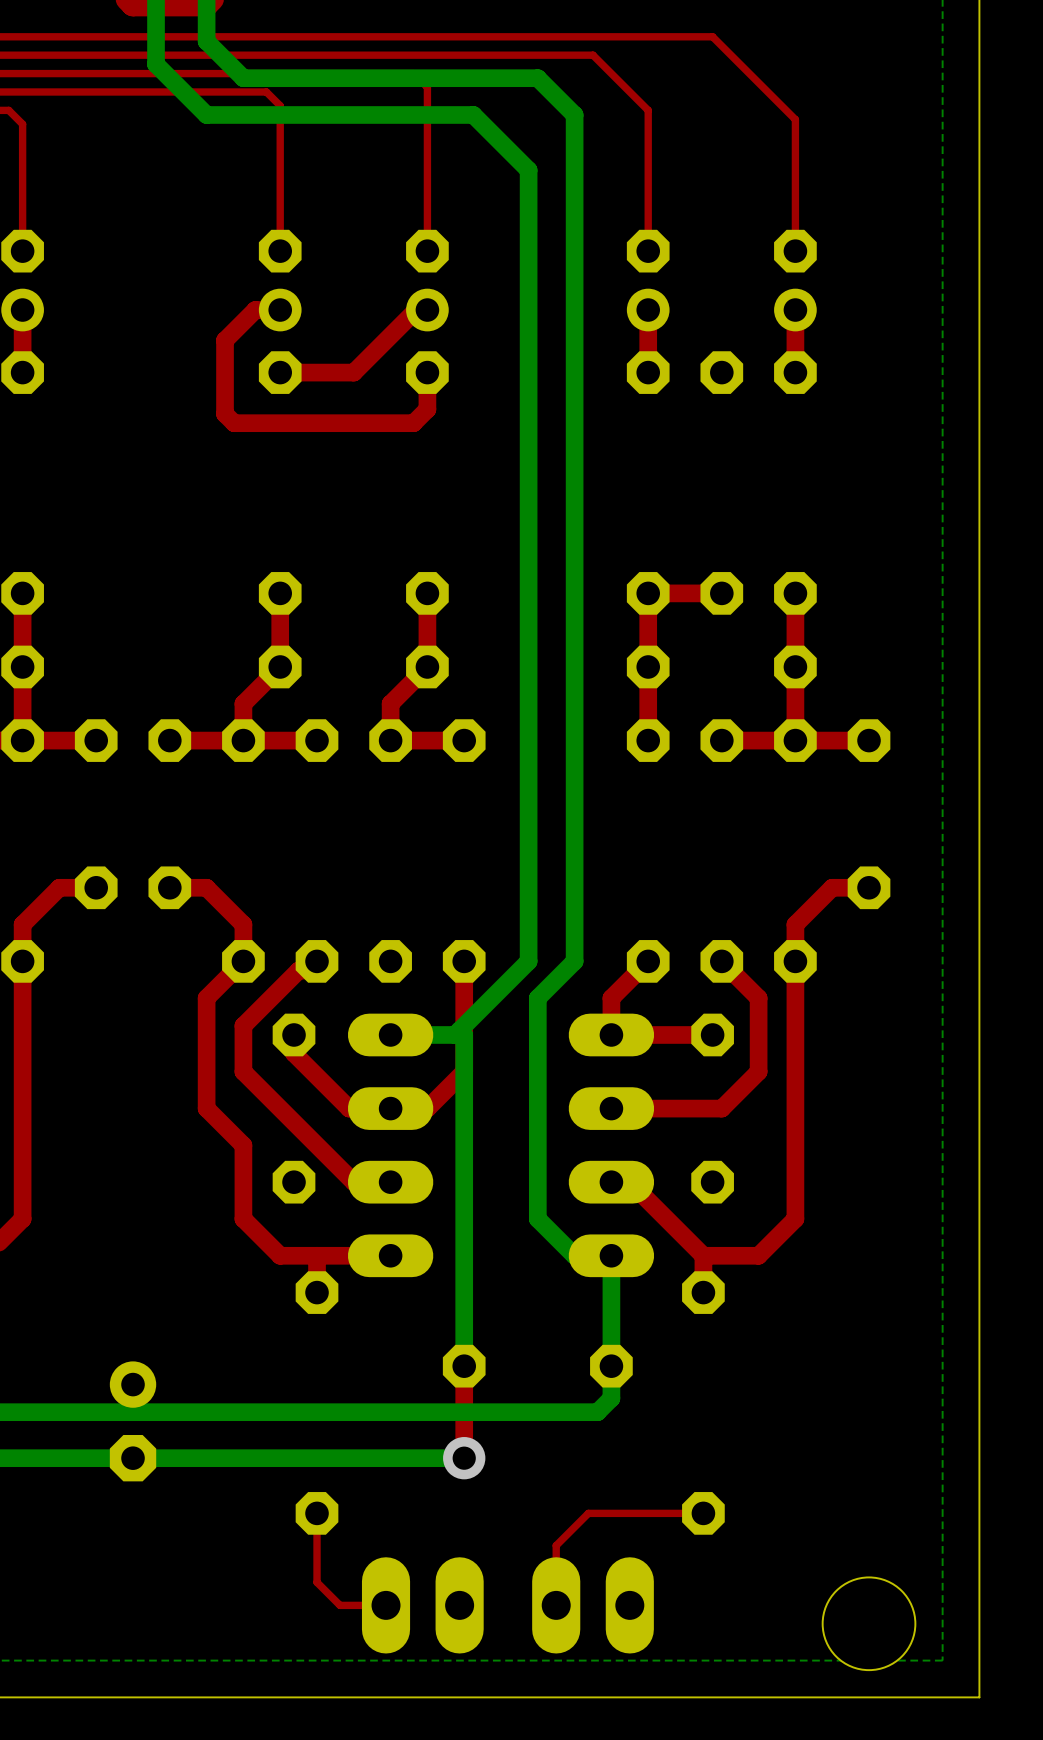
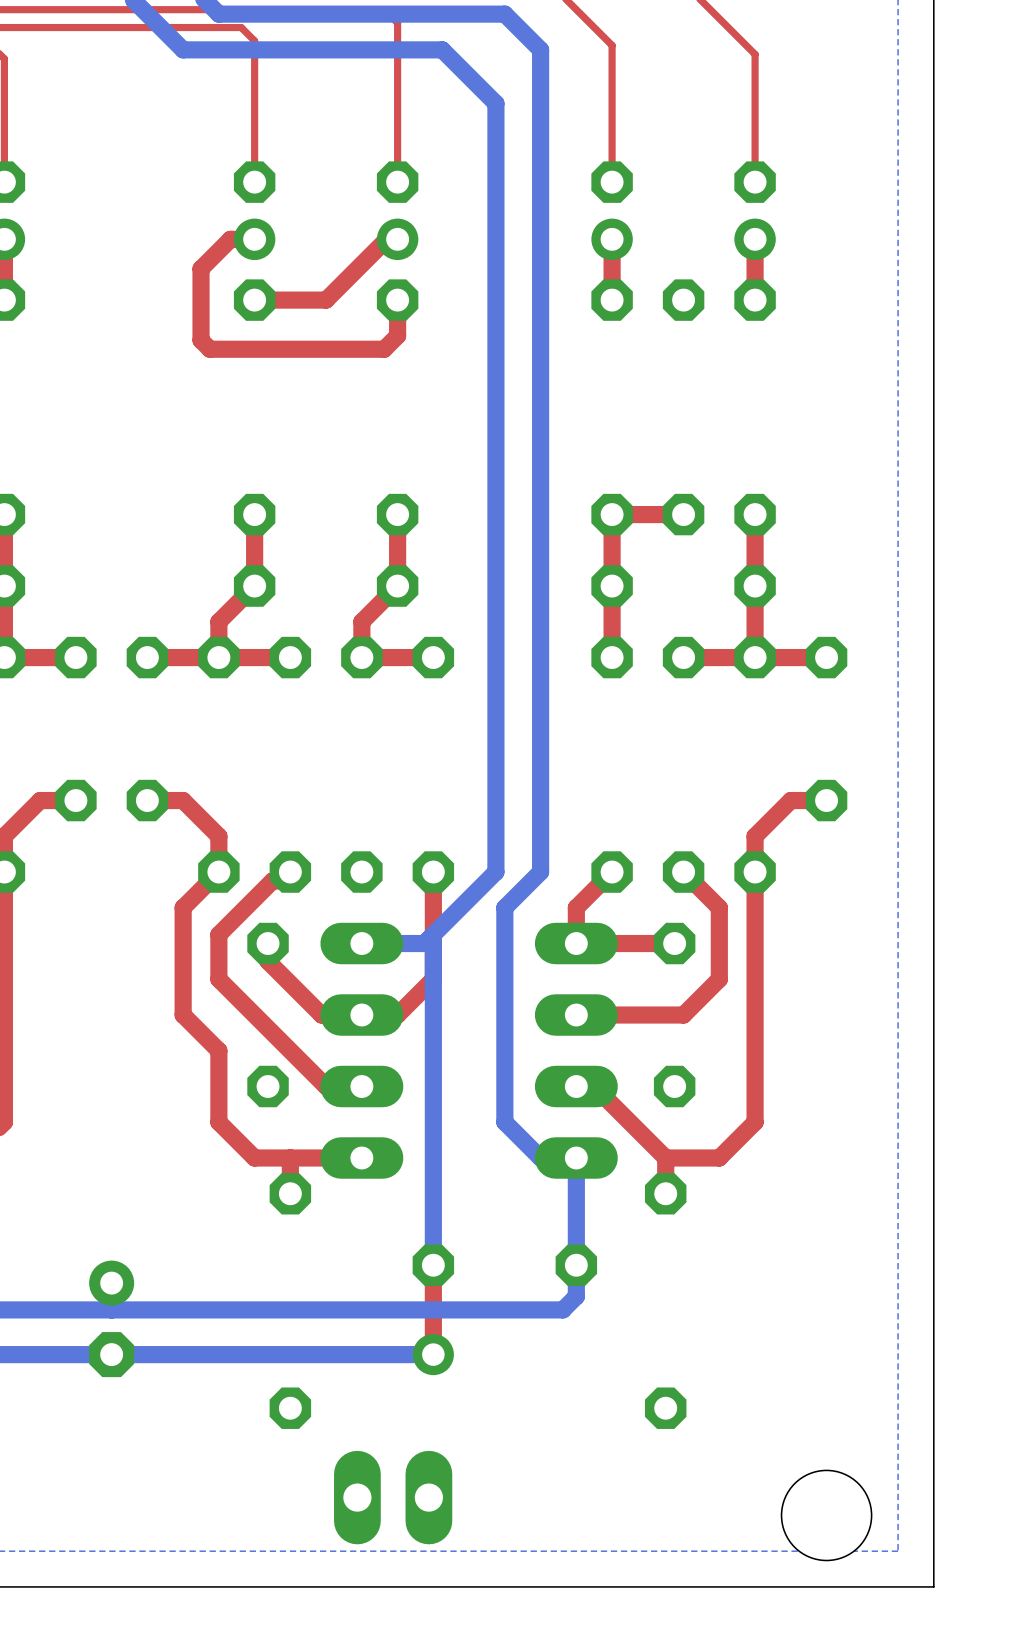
top track: (317, 1513) (317, 1582) (340, 1605) (386, 1605) -> none
top track: (703, 1513) (588, 1513) (556, 1545) (556, 1605) -> none
part: (593, 1605) -> none

